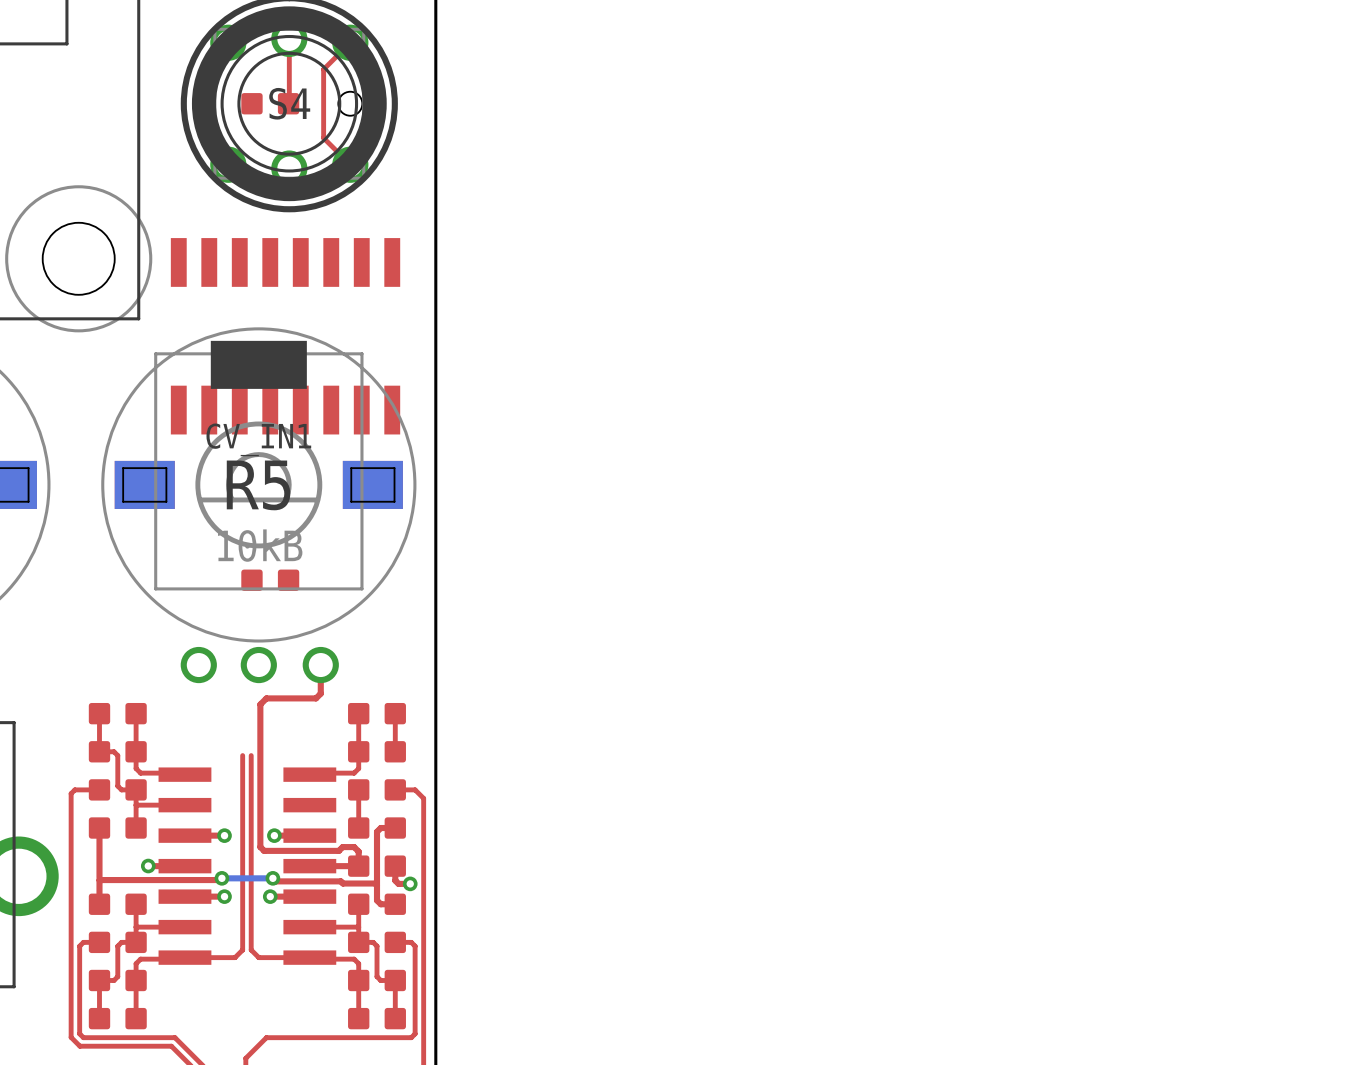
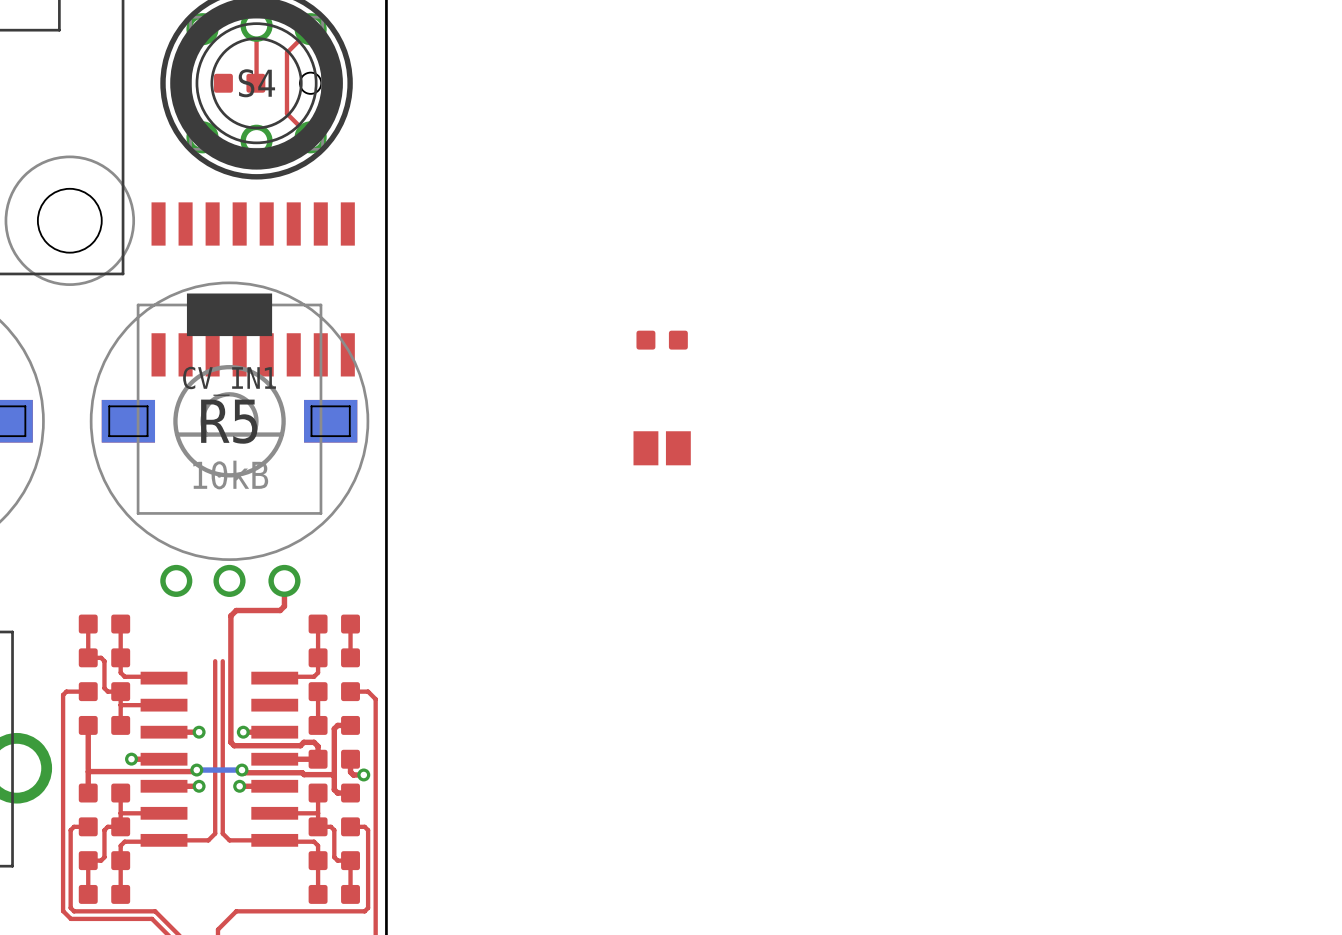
part: none -> (662, 340)
part: none -> (662, 448)
part: (270, 580) -> none

